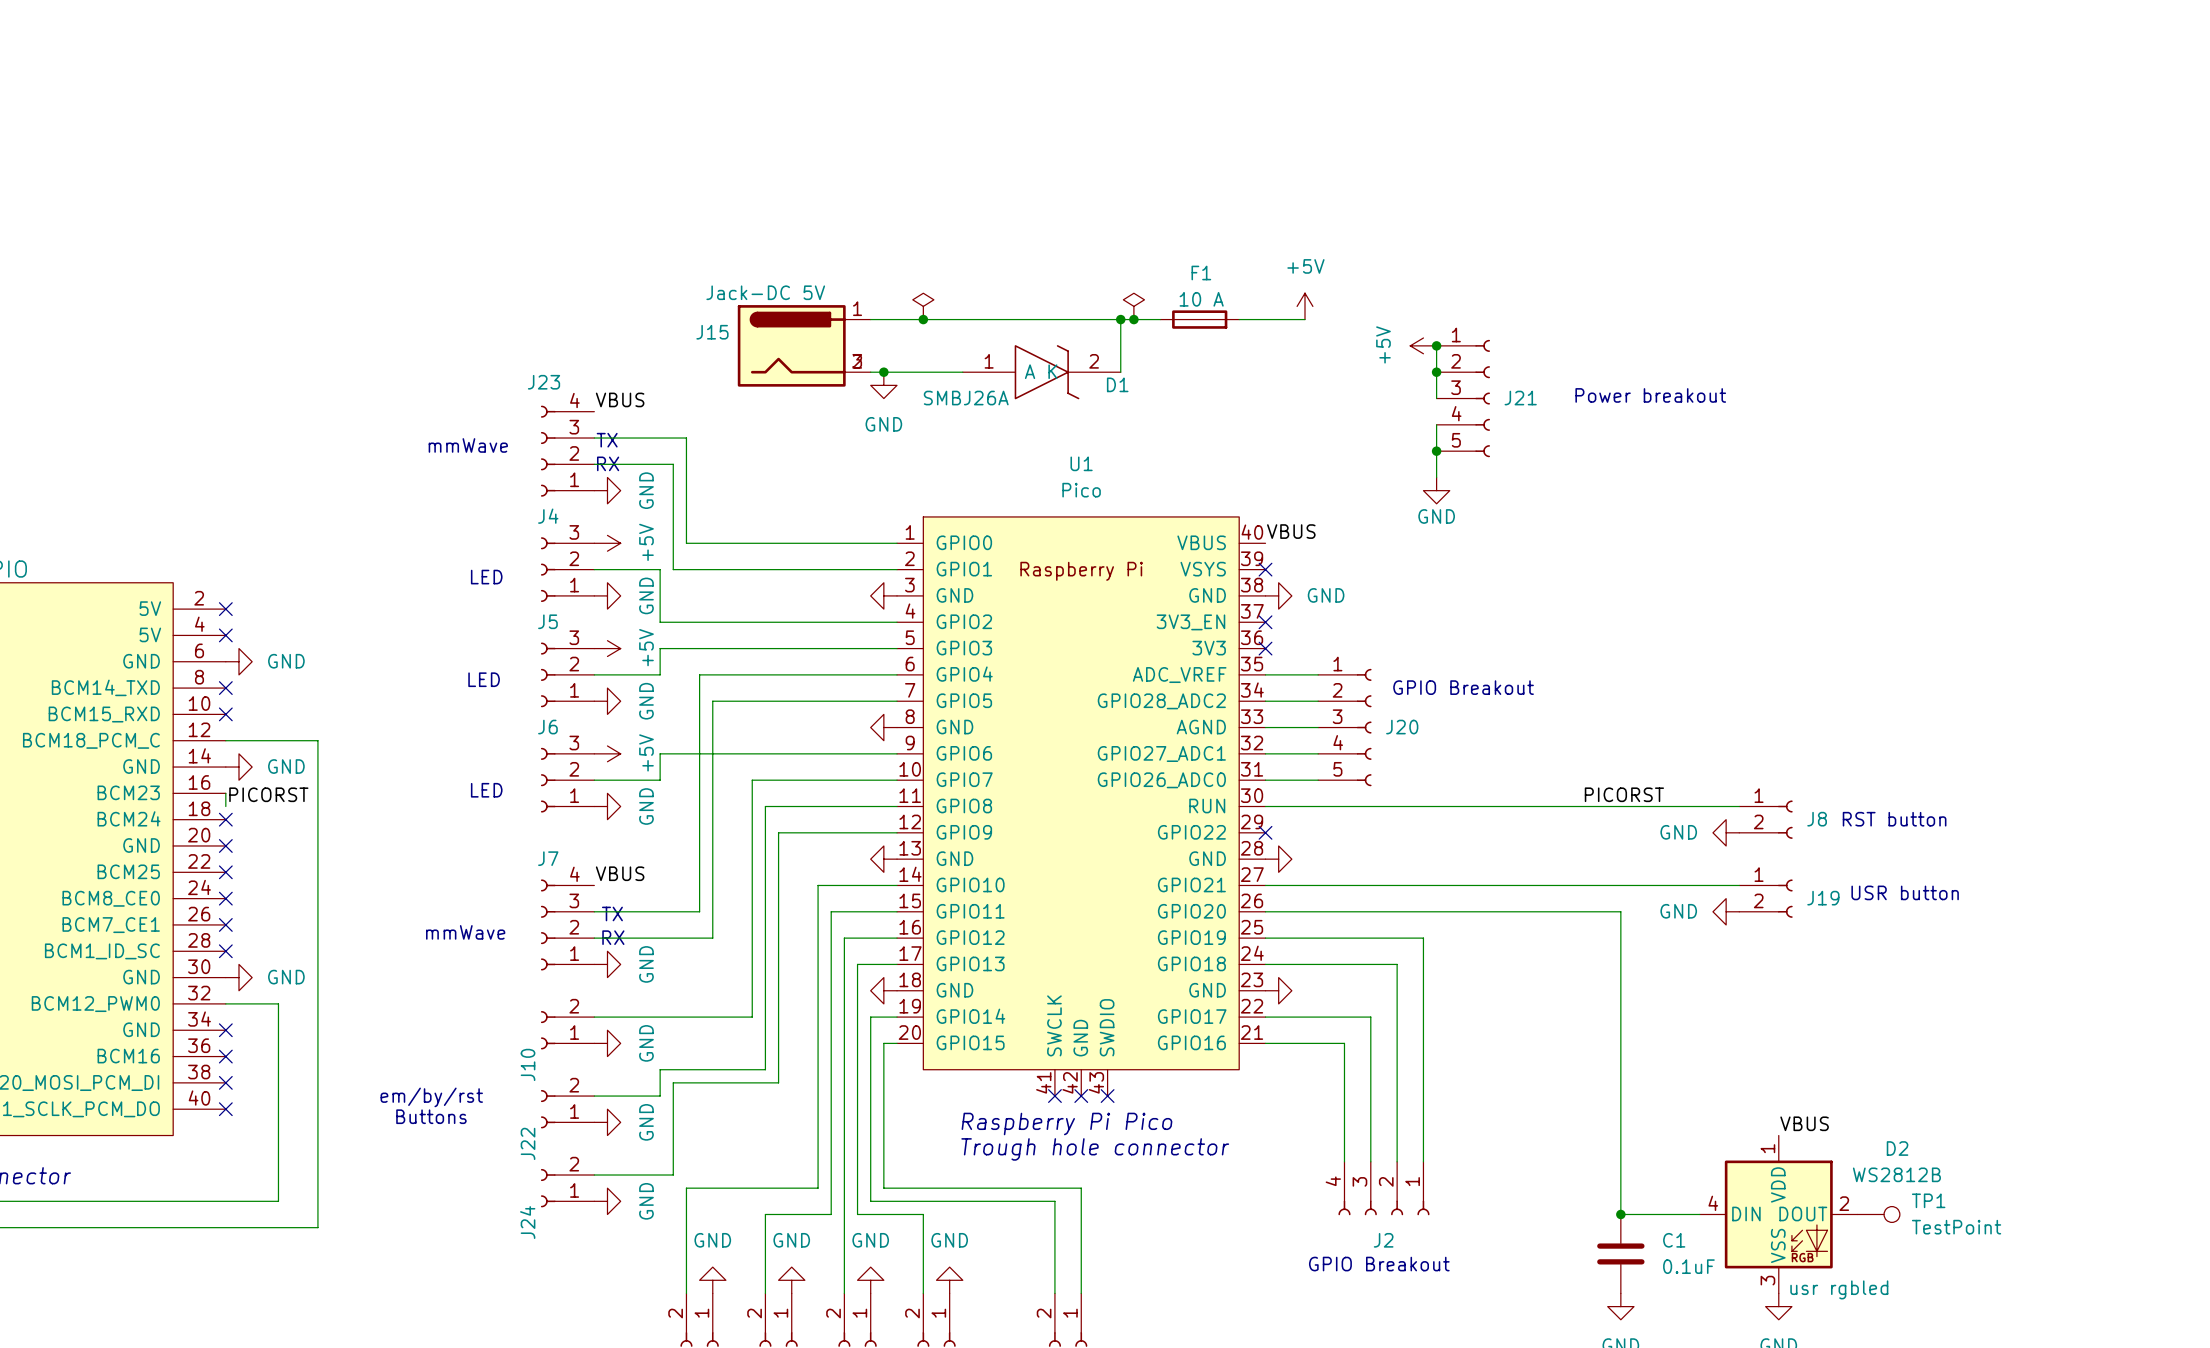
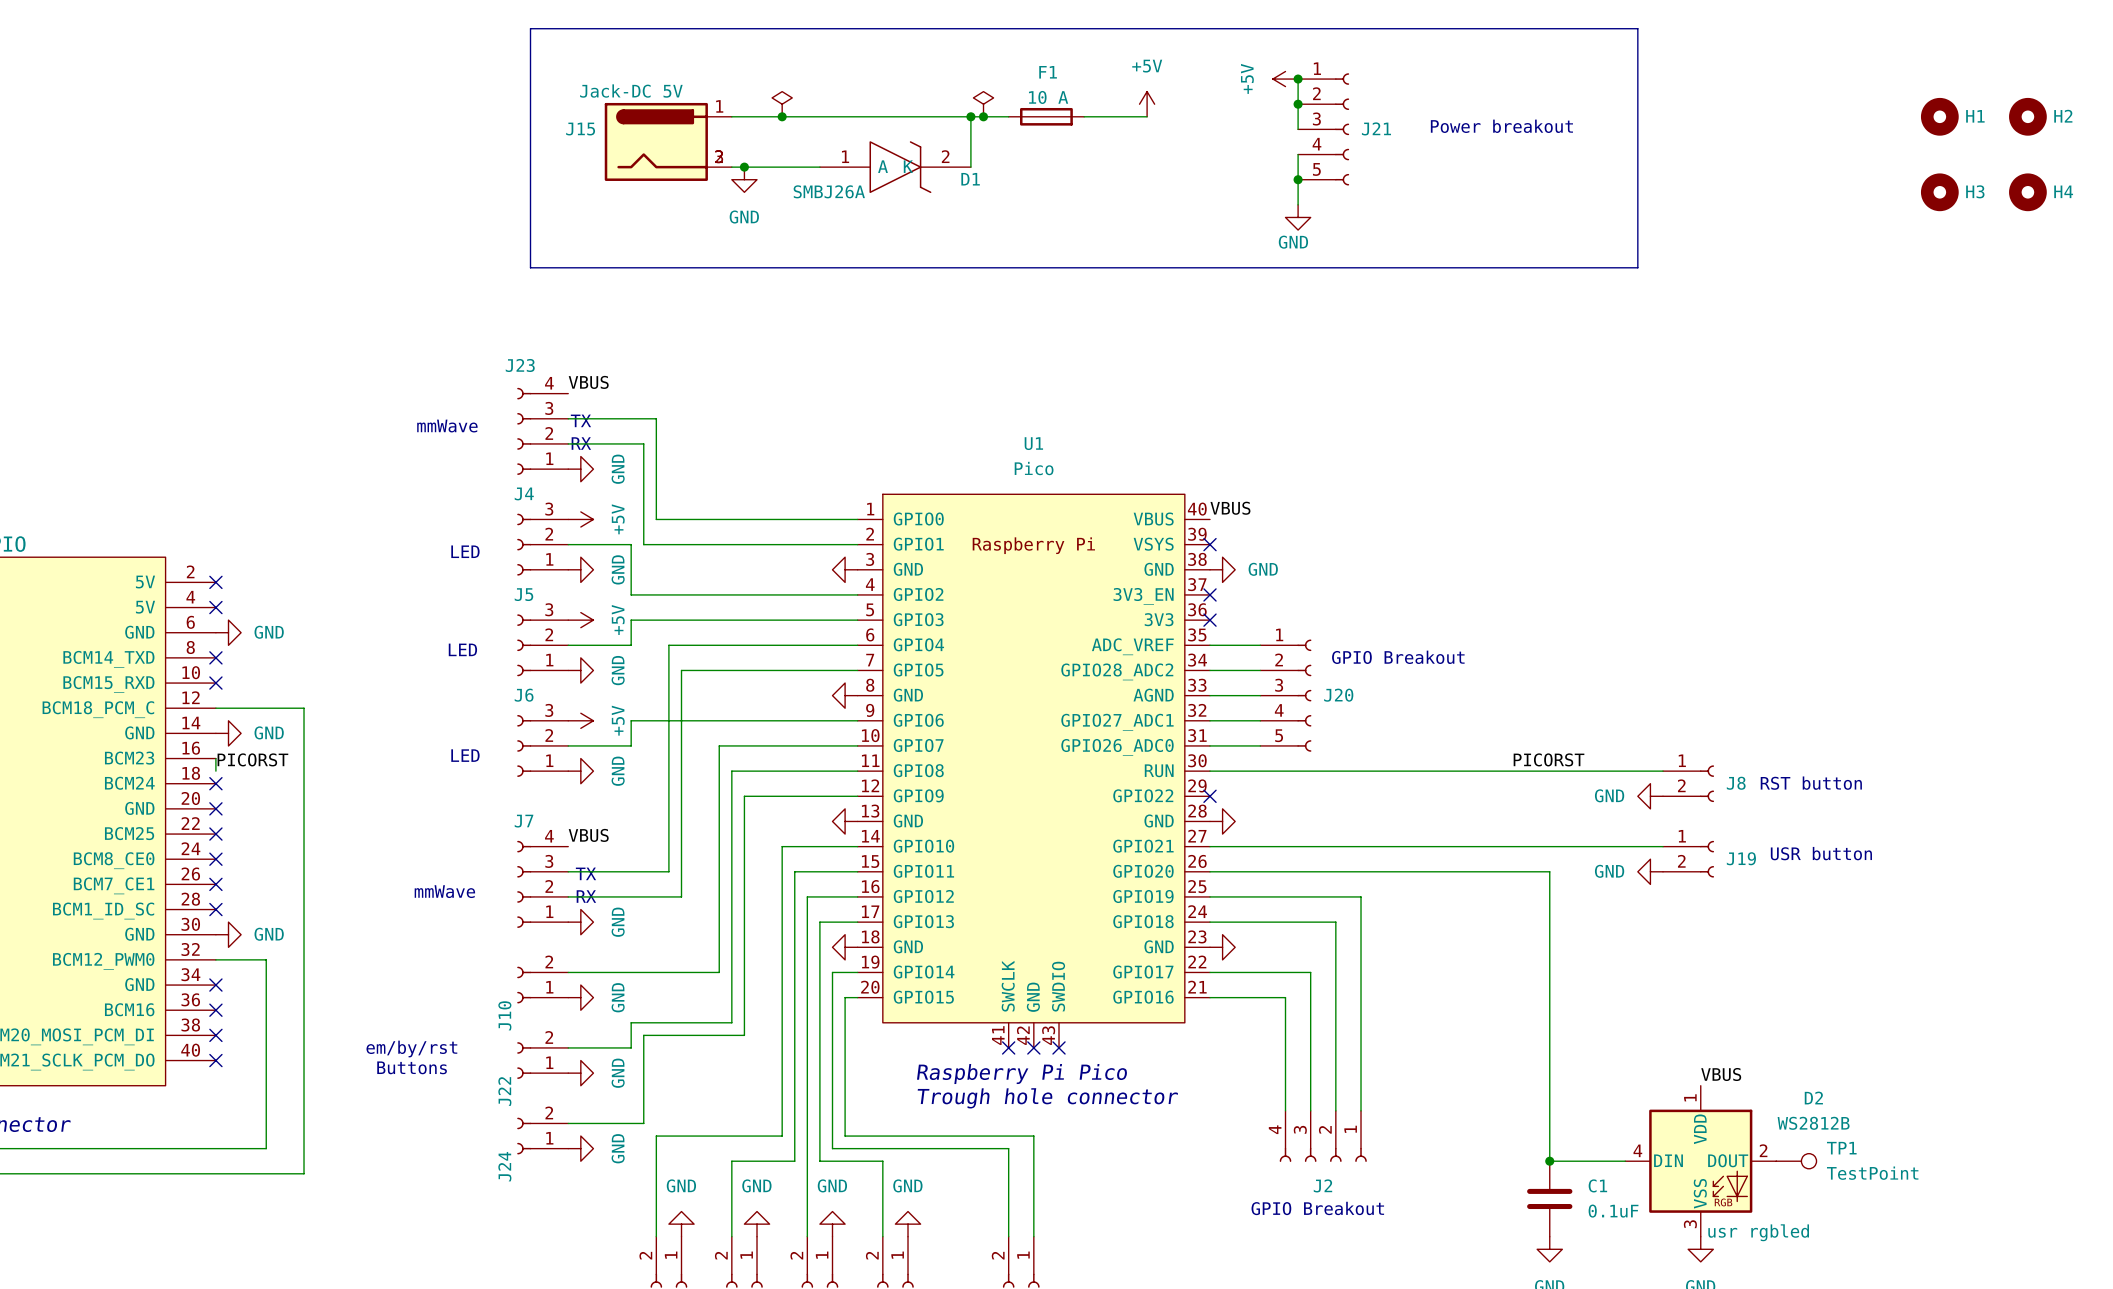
line: none -> (530, 28) (1637, 28) (1637, 267) (530, 267) (530, 28)
power symbol: none -> +5V (1285, 79)
wire: none -> (1298, 79) (1298, 129)
junction: none -> (1298, 79)
power symbol: none -> (782, 104)
power symbol: none -> (983, 104)
power symbol: none -> +5V (1147, 104)
junction: none -> (1298, 104)
junction: none -> (782, 116)
junction: none -> (970, 116)
junction: none -> (983, 116)
H1: none -> (1939, 116)
H2: none -> (2027, 116)
text: none -> Power breakout (1501, 126)
junction: none -> (744, 167)
junction: none -> (1298, 179)
H3: none -> (1939, 192)
H4: none -> (2027, 192)
power symbol: none -> GND (1298, 217)
power symbol: (923, 306) -> none
power symbol: (1133, 306) -> none
power symbol: +5V (1305, 306) -> none
wire: (870, 319) (1160, 319) -> (731, 116) (1008, 116)
junction: (923, 319) -> none
wire: (1120, 319) (1120, 372) -> (970, 116) (970, 167)
junction: (1120, 319) -> none
junction: (1133, 319) -> none
F1 position: (1199, 319) -> (1046, 116)
wire: (1239, 319) (1305, 319) -> (1084, 116) (1147, 116)
J15 position: (804, 345) -> (668, 141)
power symbol: +5V (1423, 345) -> none
wire: (1436, 345) (1436, 398) -> (1298, 154) (1298, 204)
junction: (1436, 345) -> none
wire: (870, 372) (962, 372) -> (731, 167) (819, 167)
junction: (883, 372) -> none
D1 position: (1041, 372) -> (895, 167)
junction: (1436, 372) -> none
power symbol position: GND (883, 385) -> GND (744, 179)
text: Power breakout (1650, 395) -> none
J21 position: (1463, 398) -> (1323, 129)
wire: (1436, 424) (1436, 477) -> none
junction: (1436, 451) -> none
power symbol: GND (1436, 490) -> none

